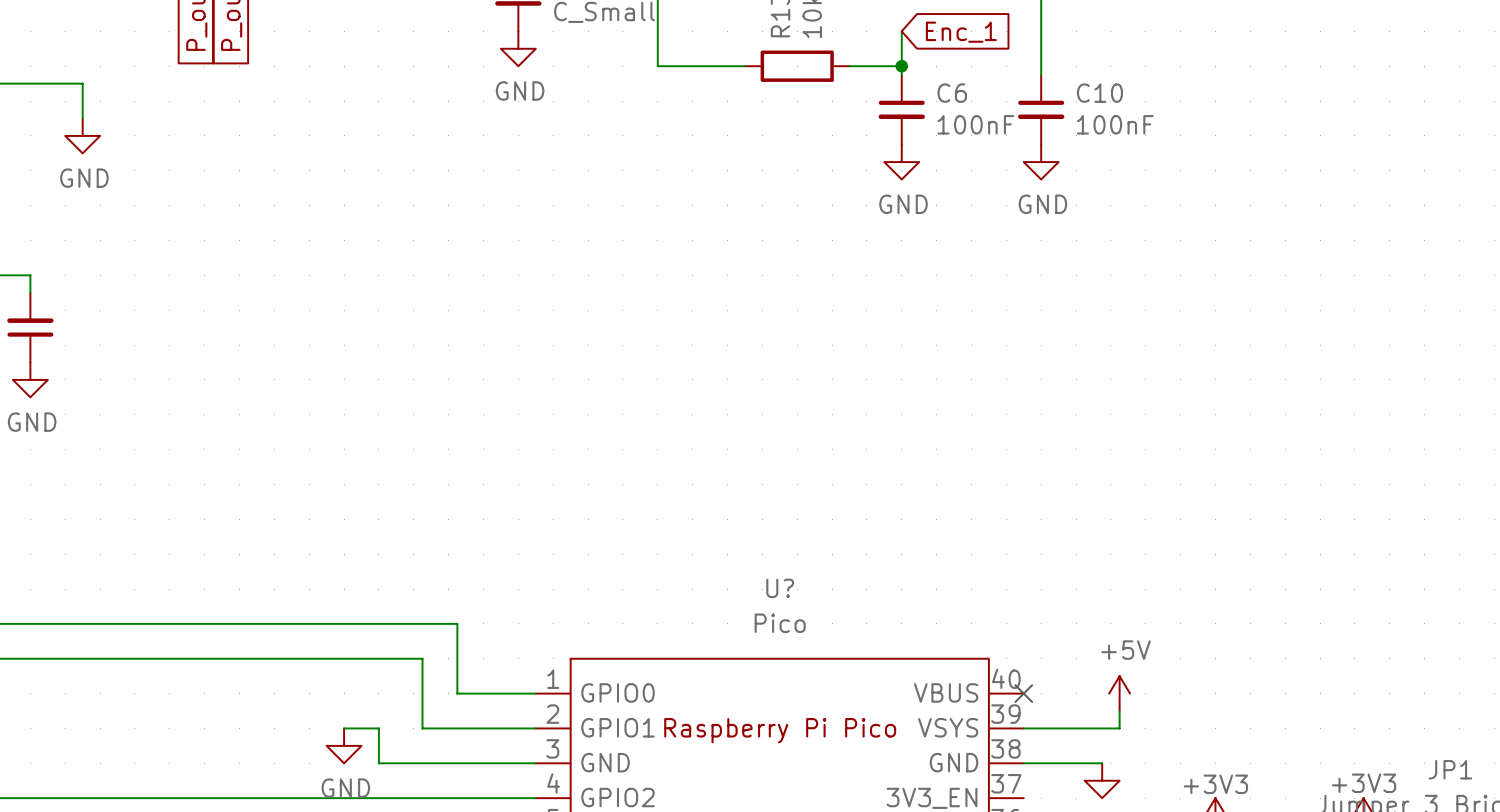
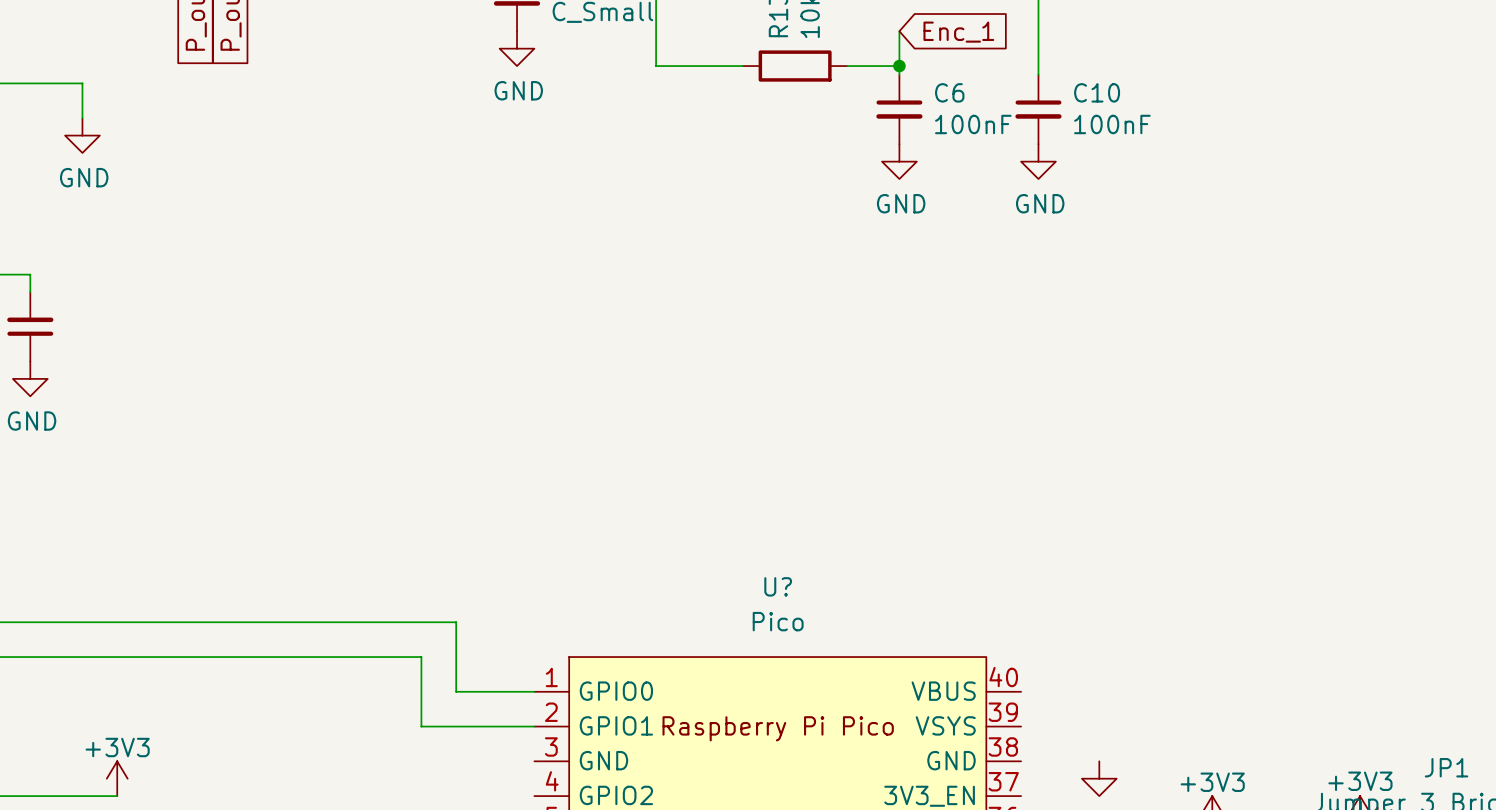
no-connect mark: (1023, 693) -> none
power symbol: +5V (1119, 693) -> none
wire: (1119, 711) (1119, 728) (1023, 728) -> none
wire: (344, 728) (378, 728) (378, 763) (535, 763) -> none
power symbol: GND (344, 745) -> none
wire: (1023, 763) (1102, 763) -> none
power symbol: none -> +3V3 (117, 778)
wire: (117, 798) (535, 798) -> none

